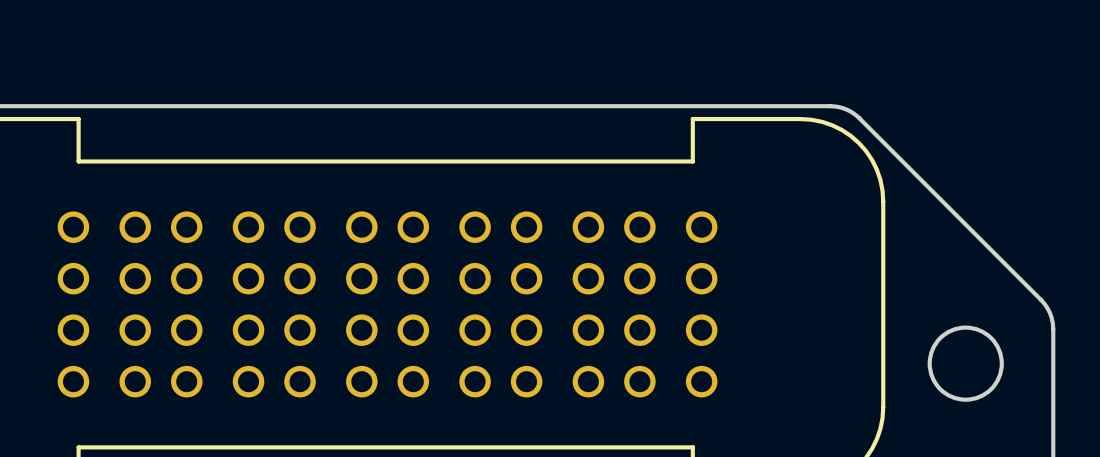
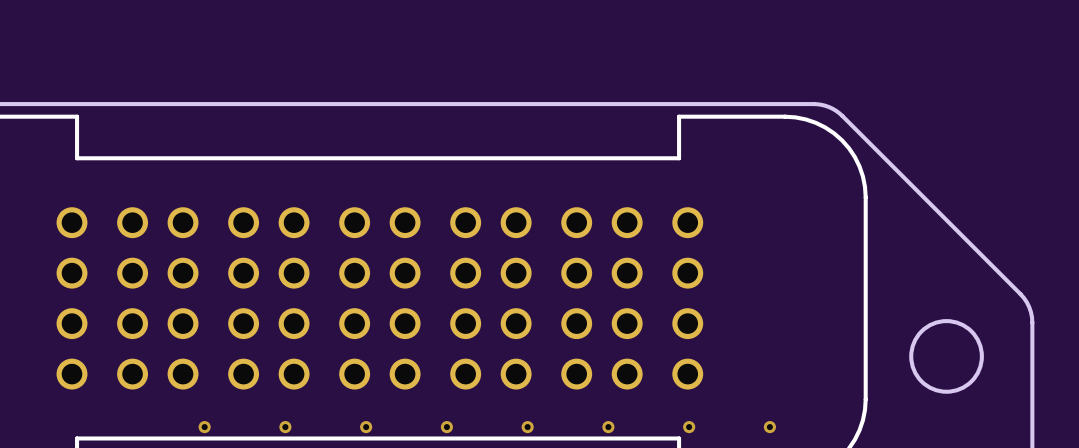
via: none -> (204, 427)
via: none -> (285, 427)
via: none -> (366, 427)
via: none -> (446, 427)
via: none -> (527, 427)
via: none -> (608, 427)
via: none -> (689, 427)
via: none -> (769, 427)

